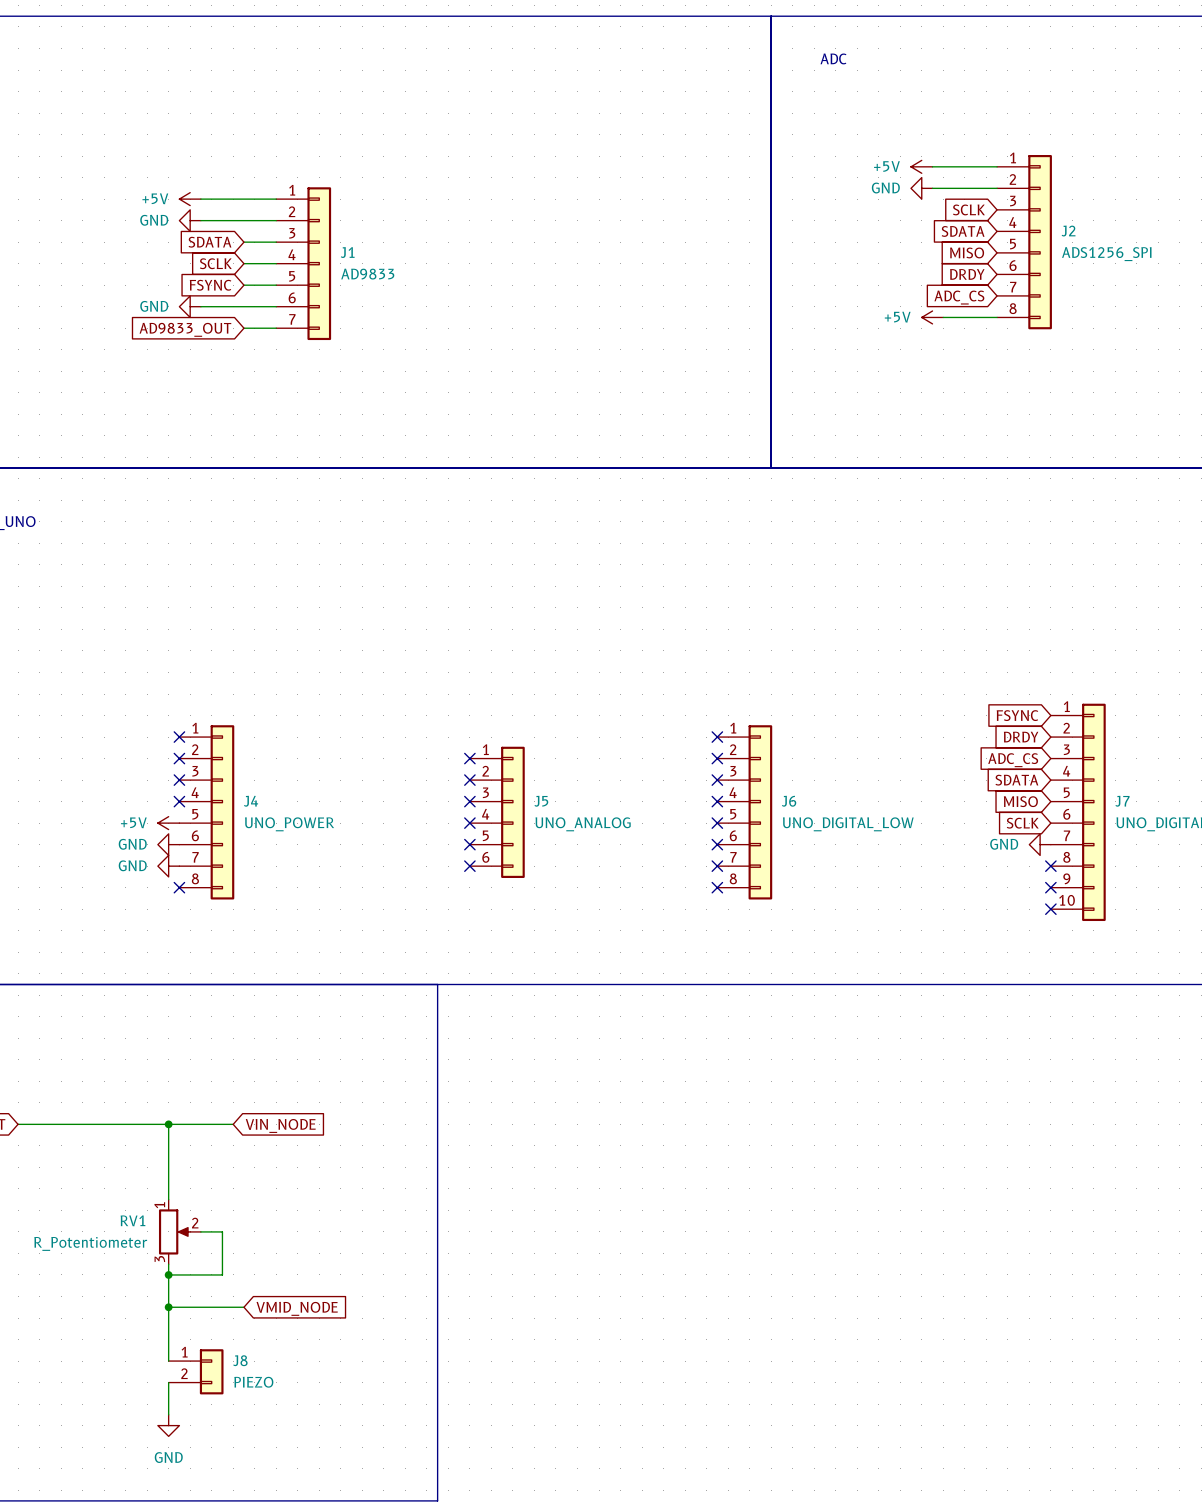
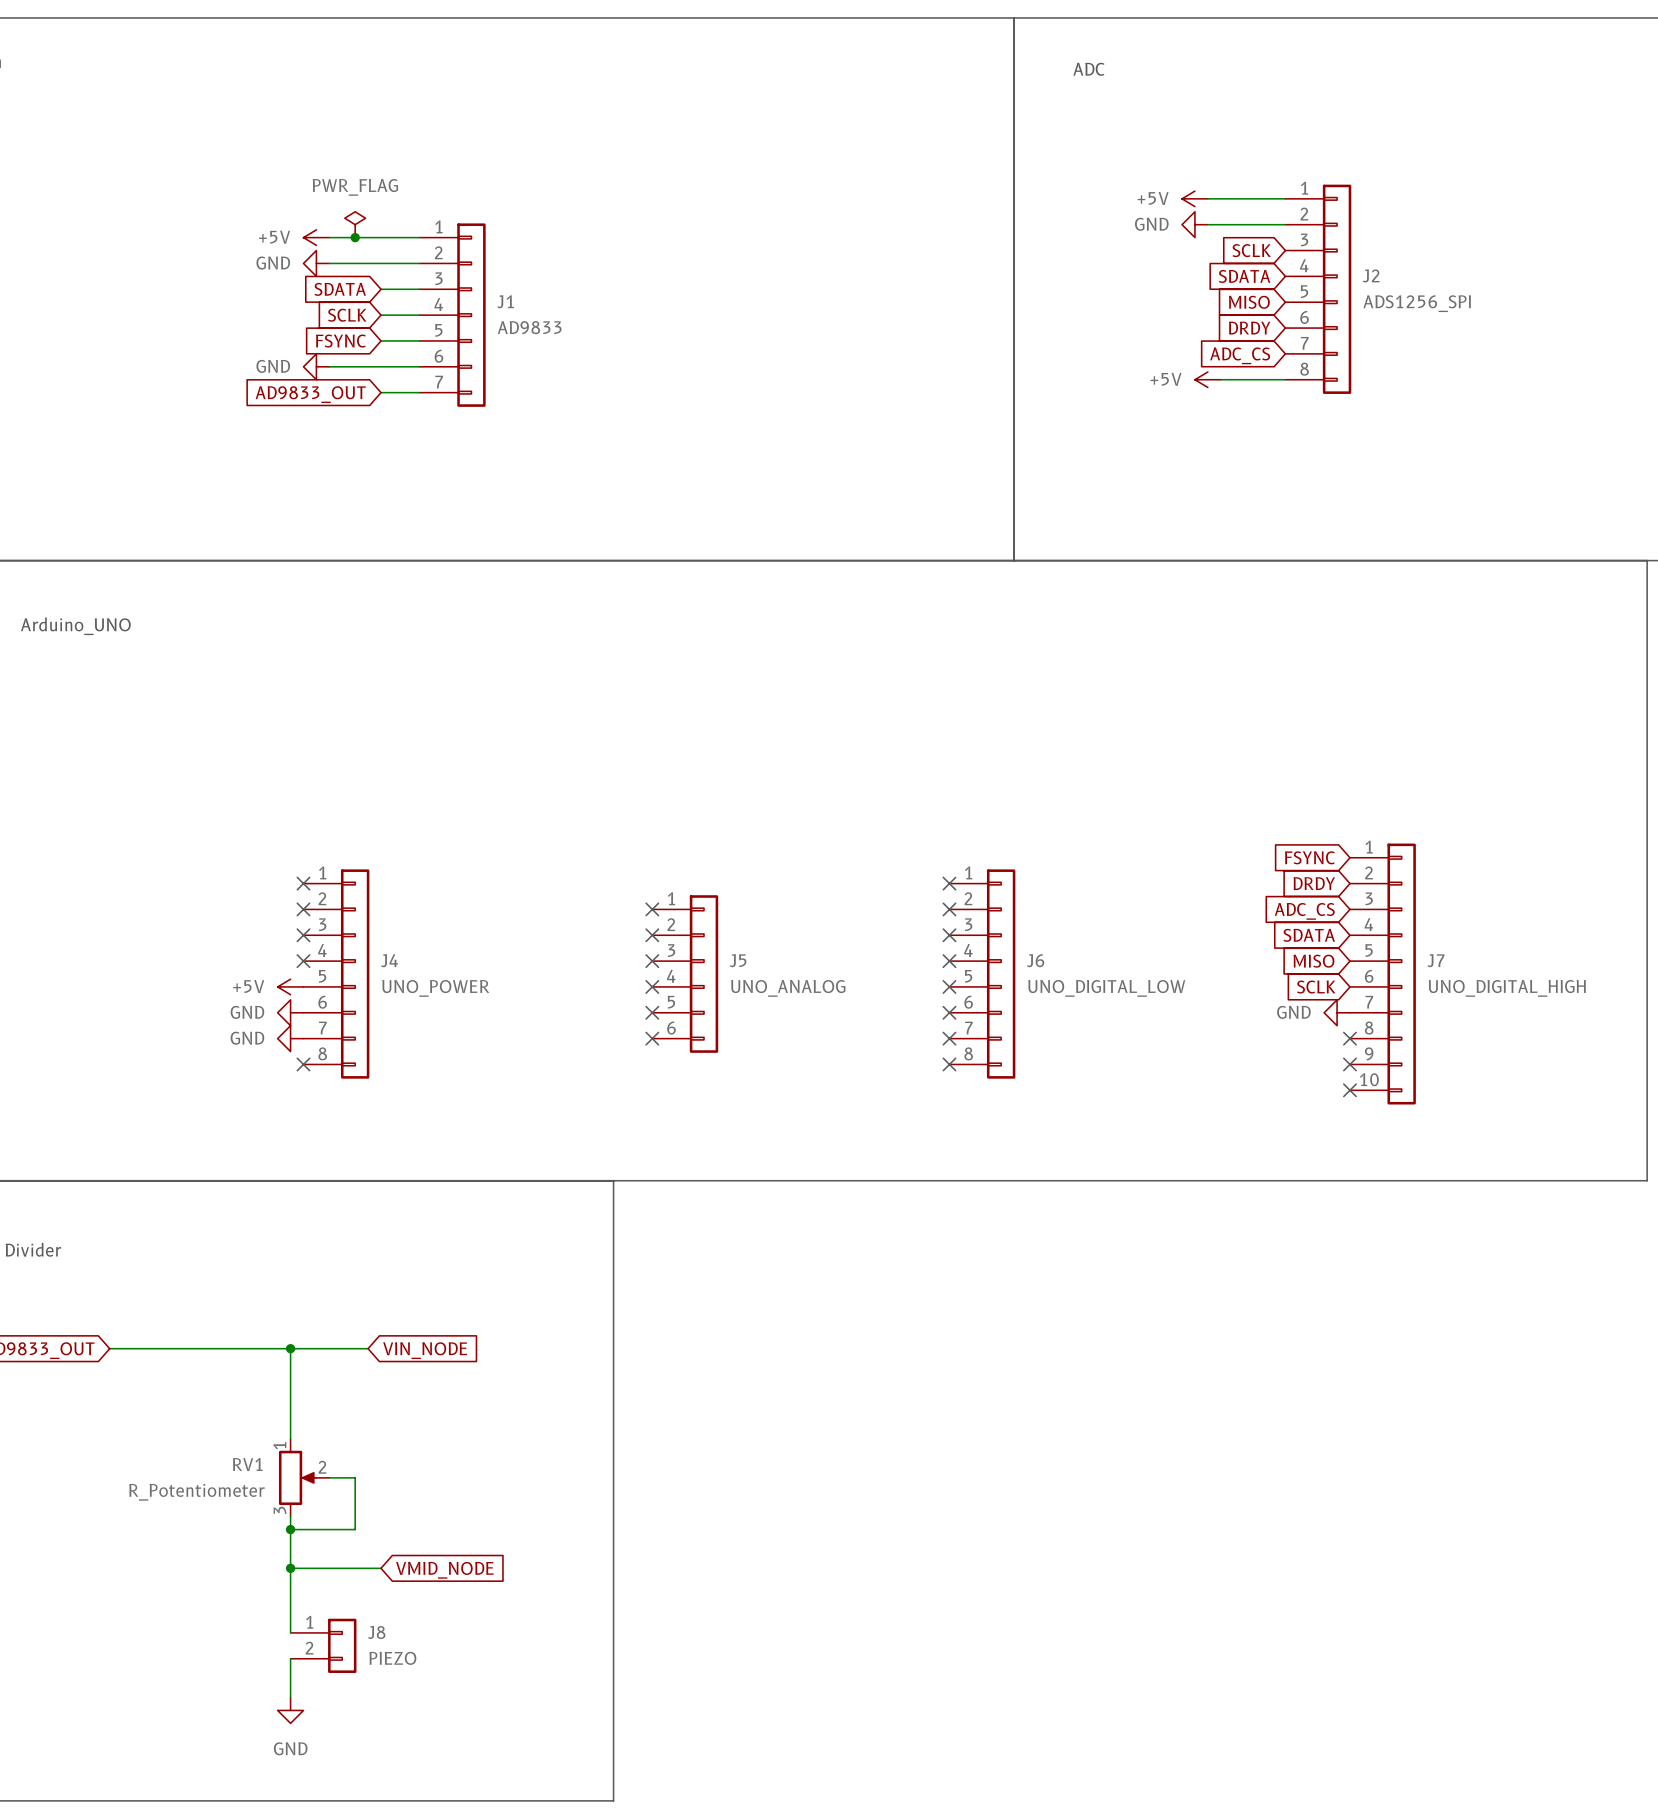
power symbol: none -> PWR_FLAG (355, 224)
junction: none -> (355, 237)

